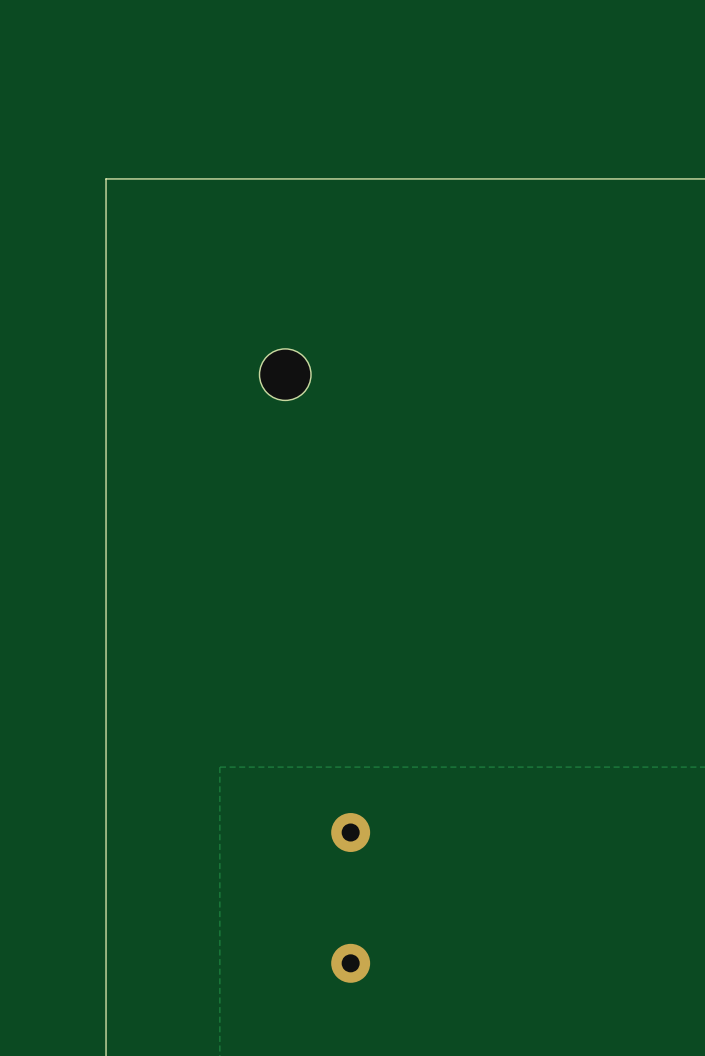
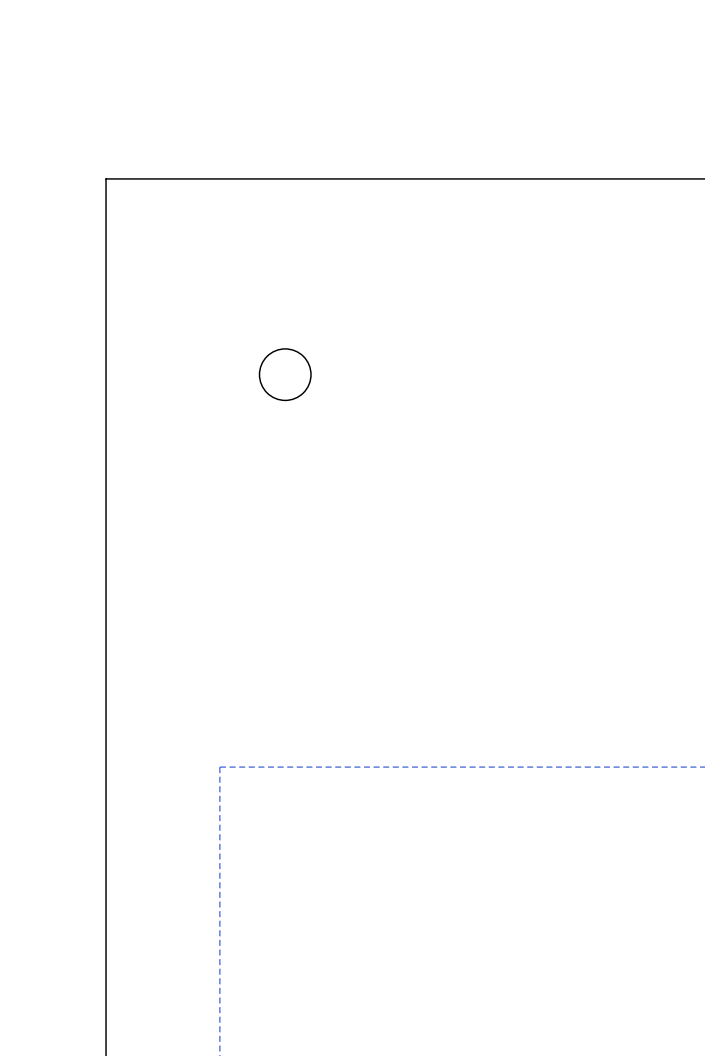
via: (350, 832) -> none
via: (350, 963) -> none

